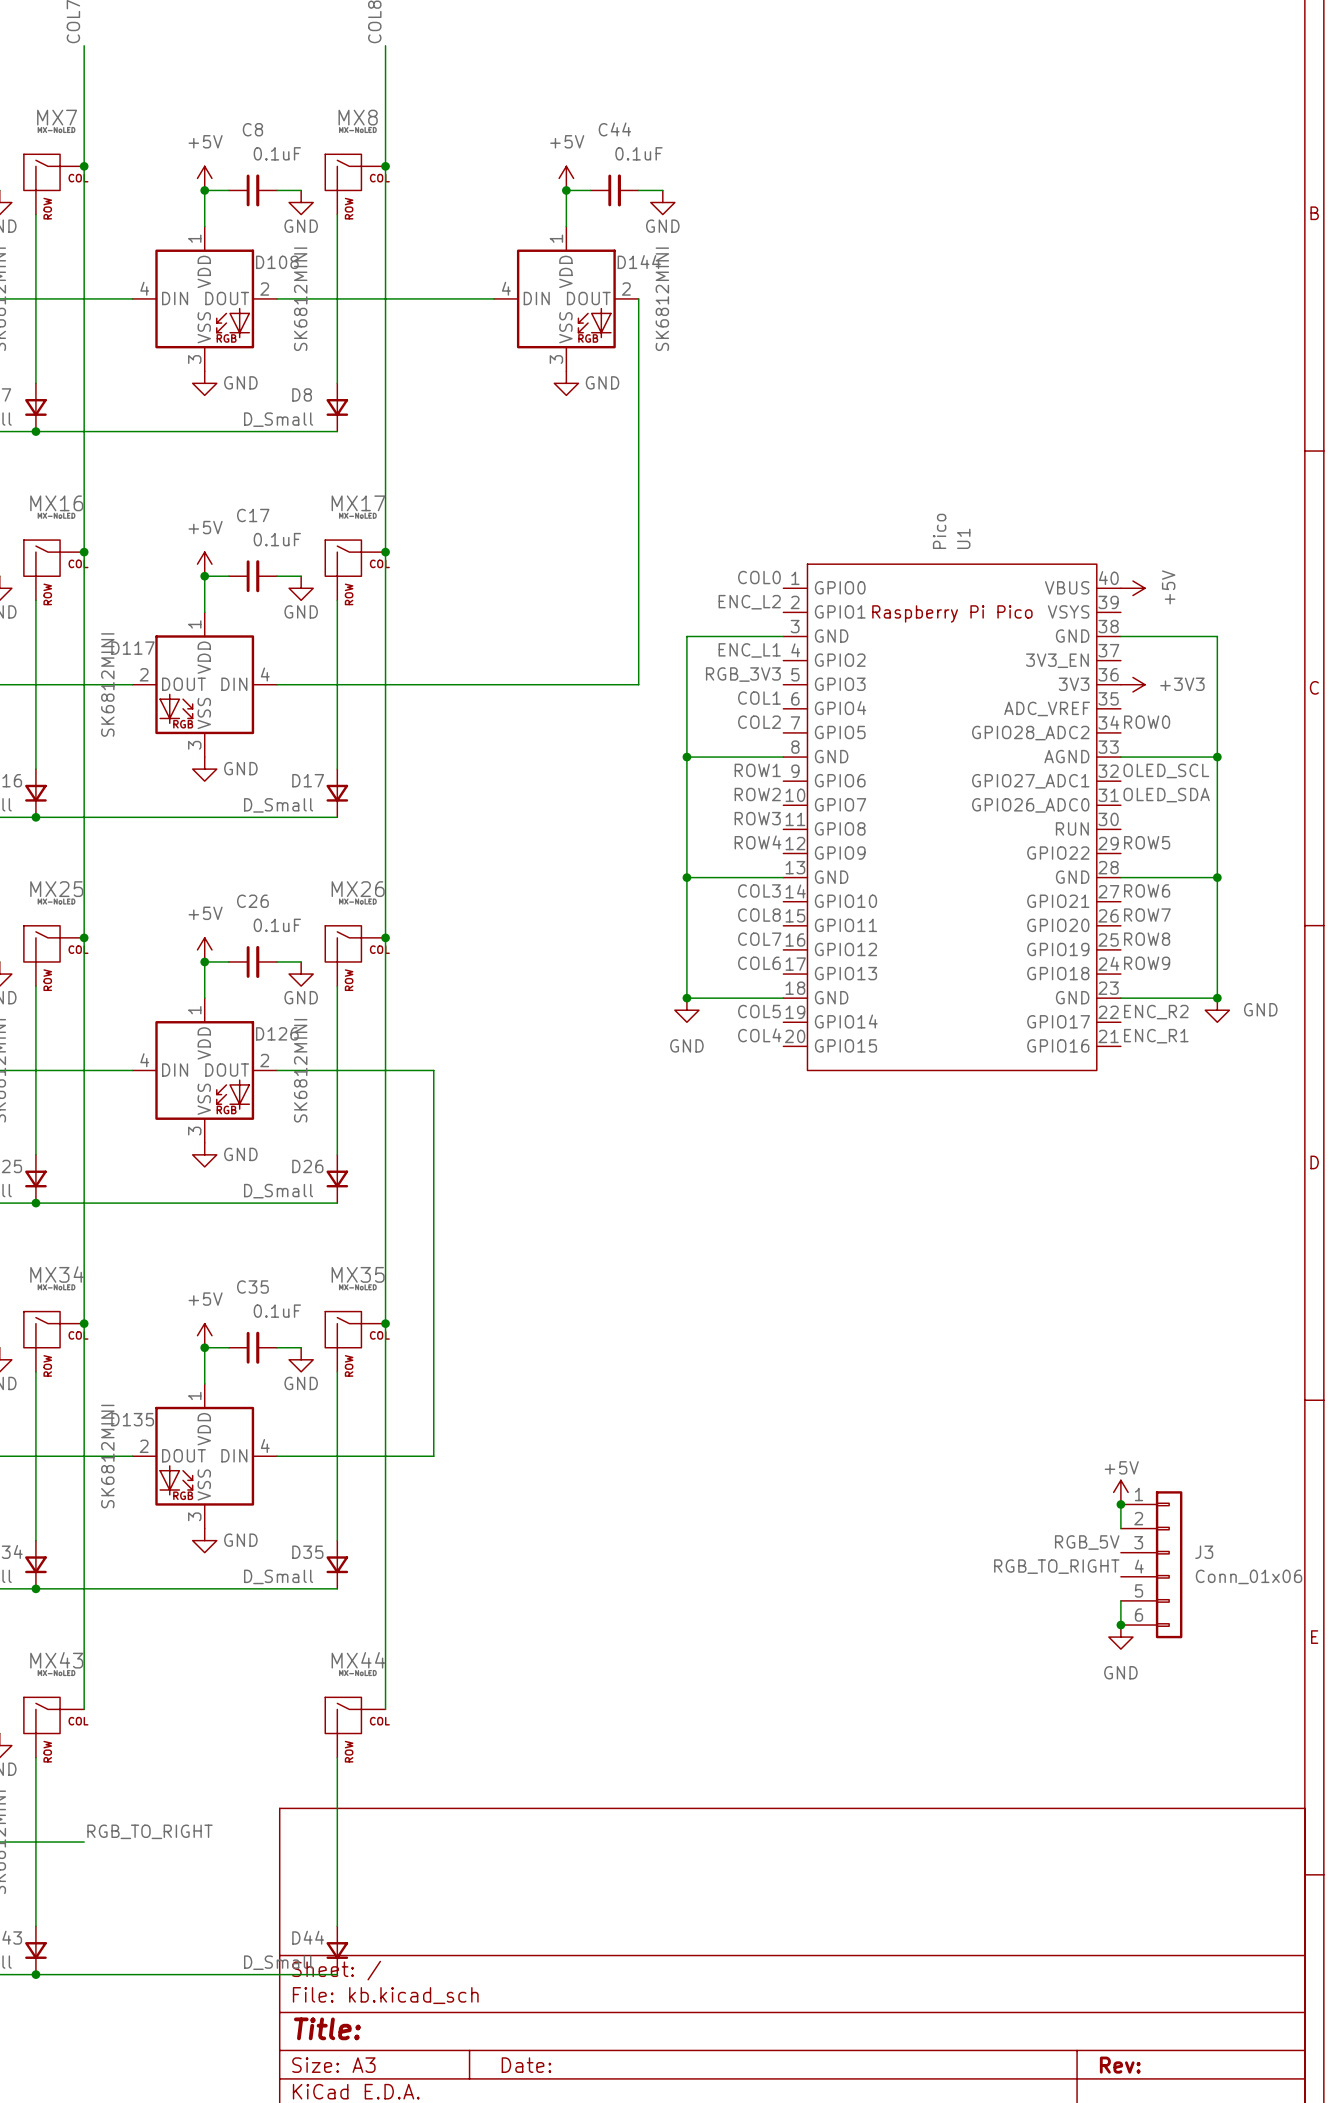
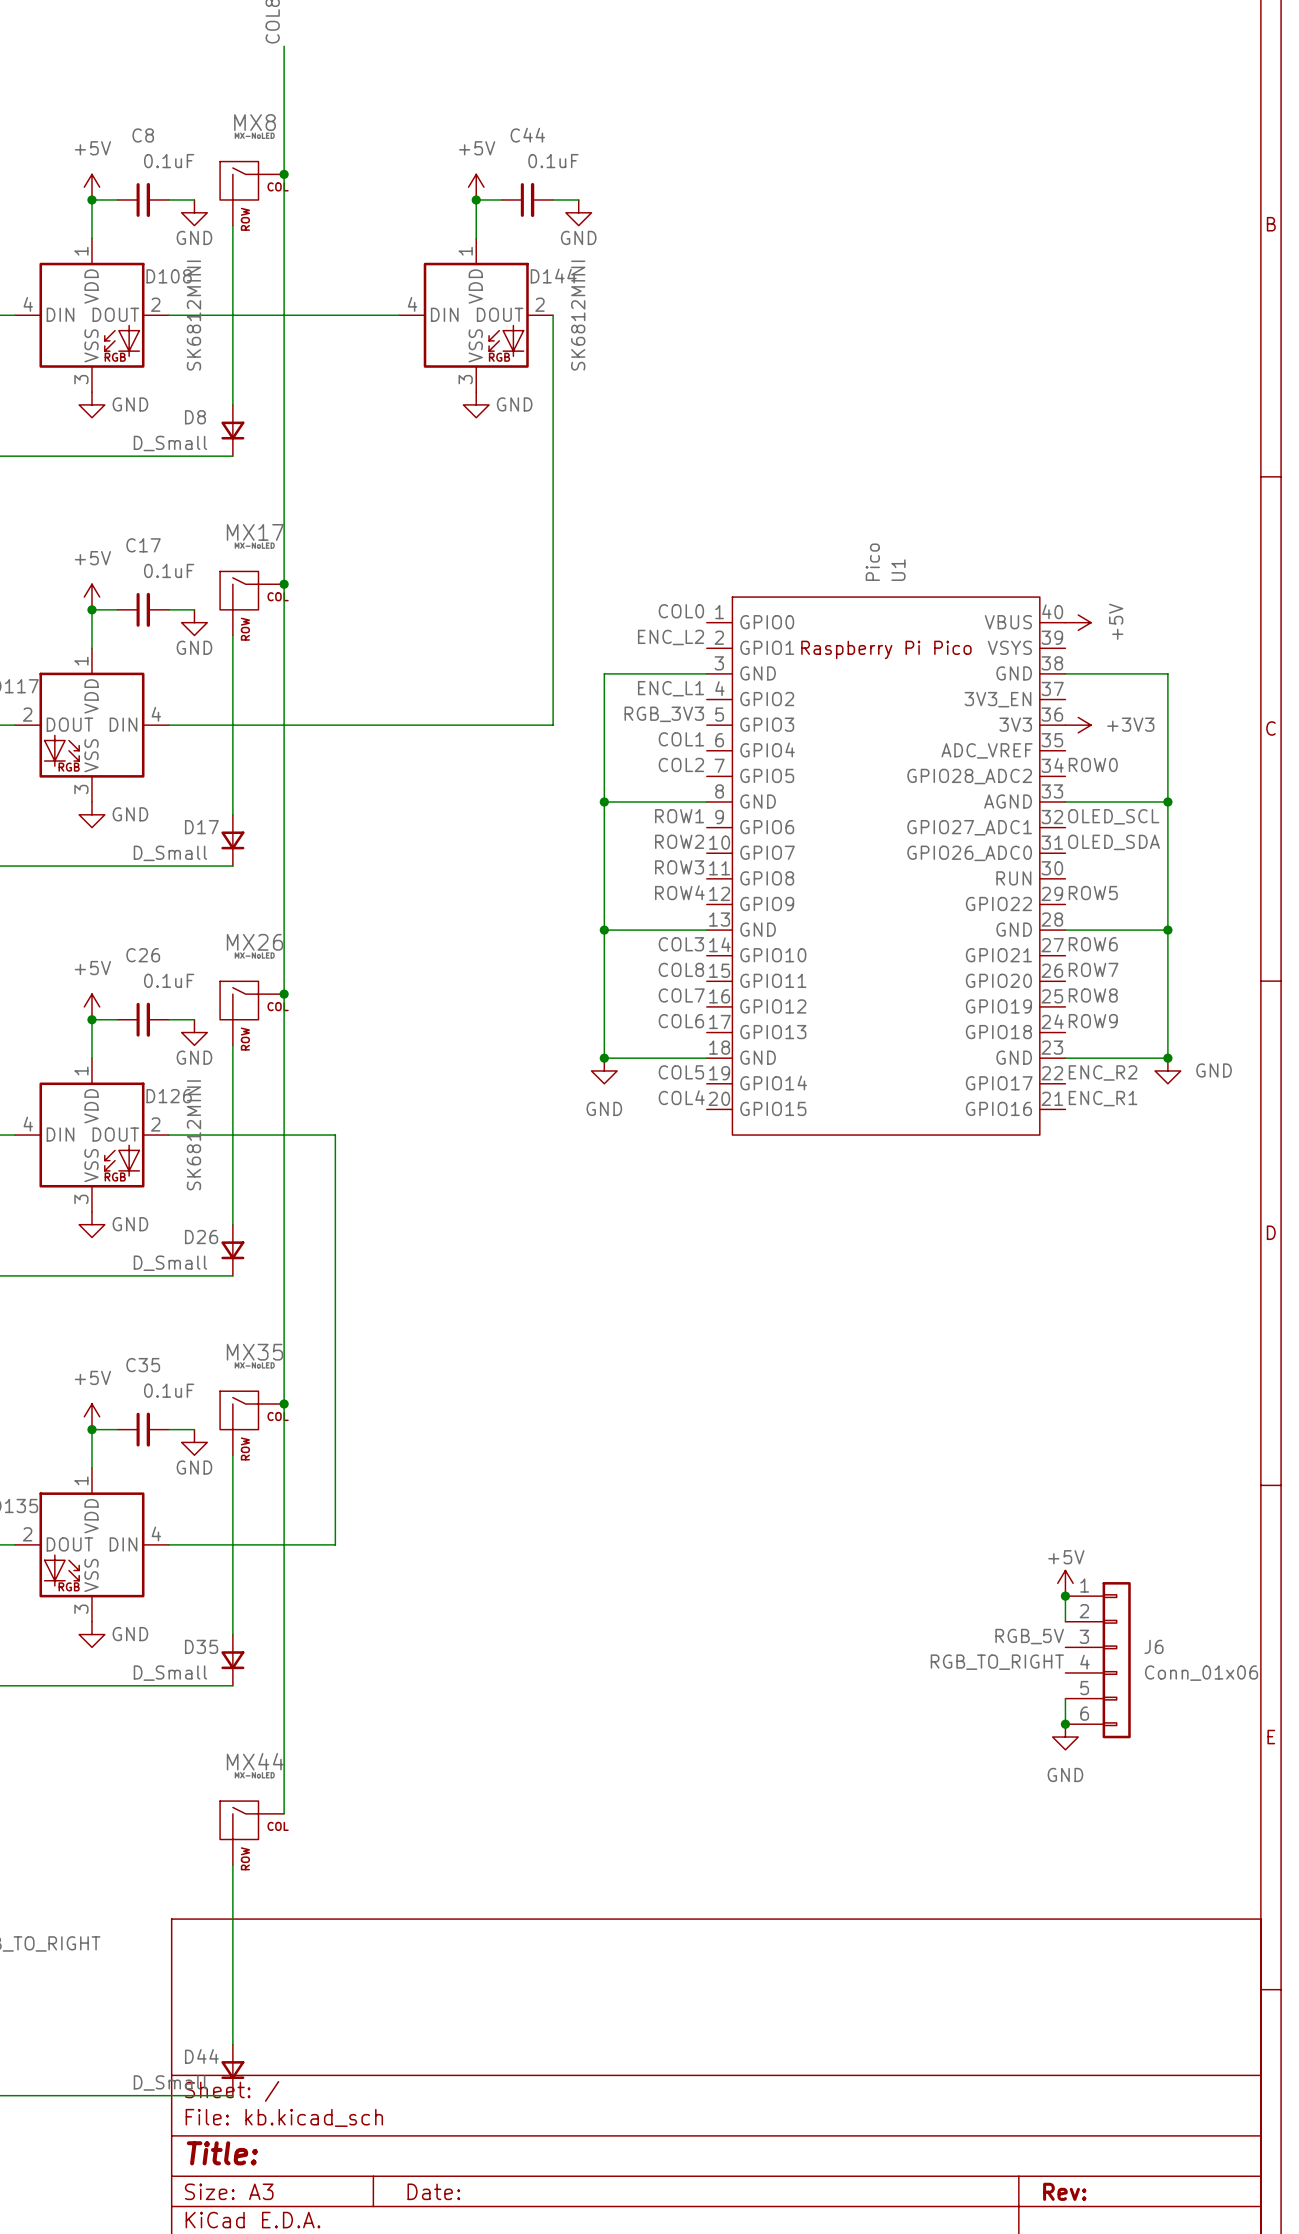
J3 name: J3 (1204, 1552) -> J6 (1153, 1646)

